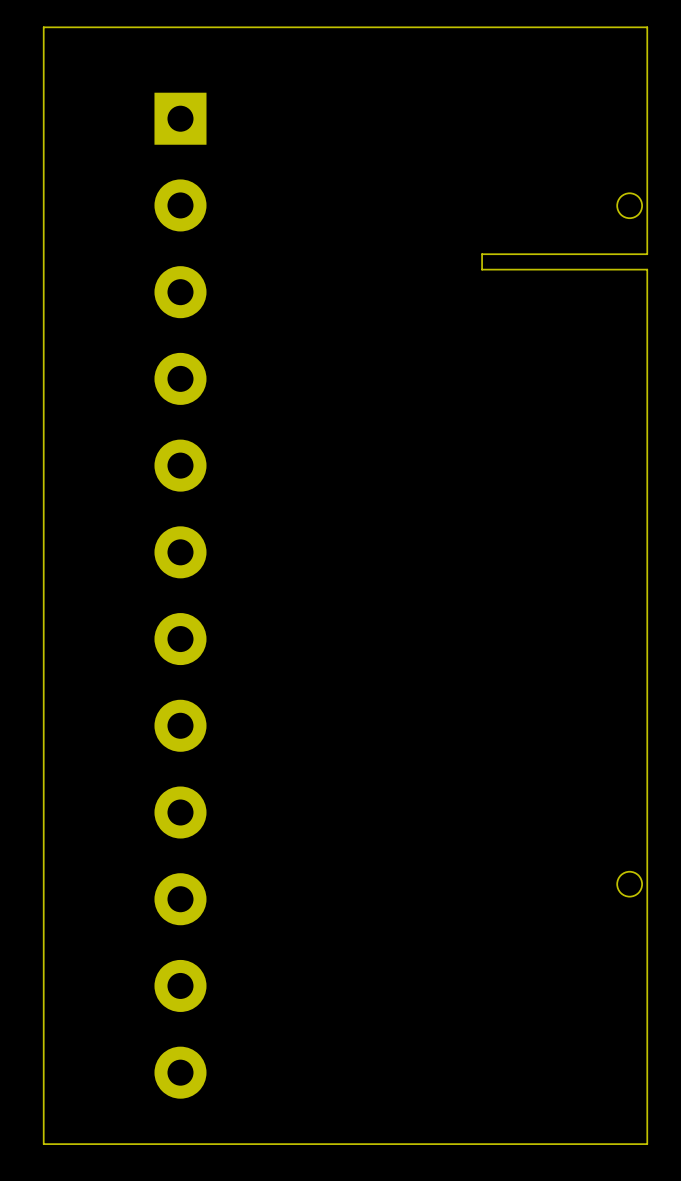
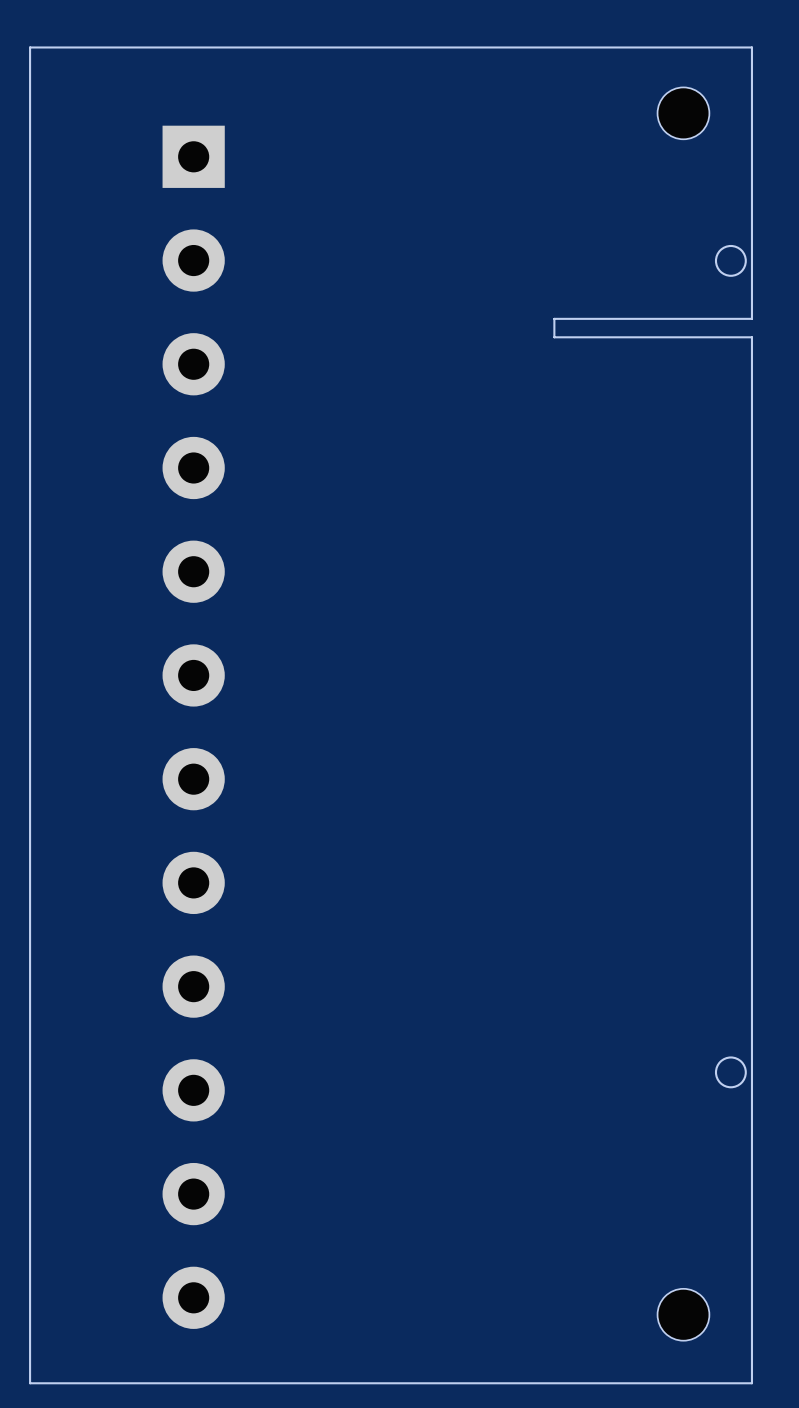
part: none -> (683, 113)
part: none -> (683, 1314)

